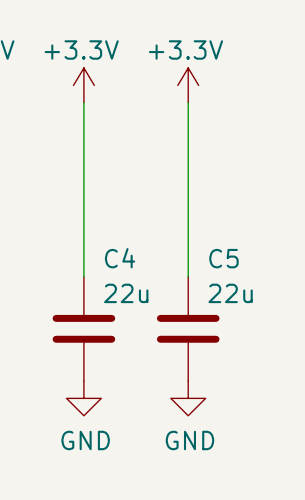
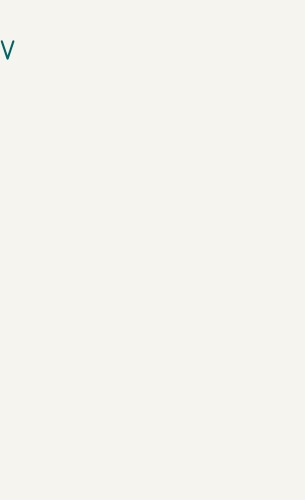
power symbol: +3.3V (83, 85) -> none
power symbol: +3.3V (188, 85) -> none
wire: (83, 102) (83, 276) -> none
wire: (188, 102) (188, 276) -> none
C4: 22u (83, 328) -> none
C5: 22u (188, 328) -> none
power symbol: GND (83, 398) -> none
power symbol: GND (188, 398) -> none

